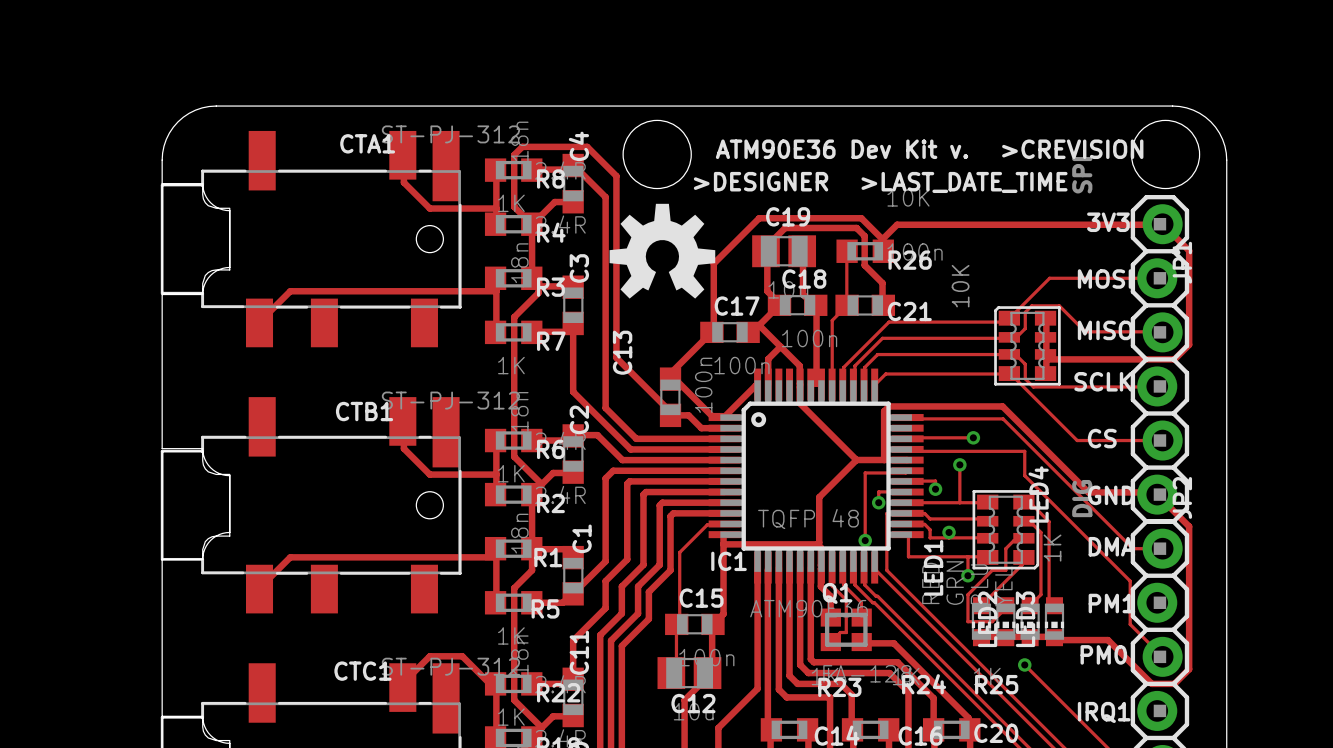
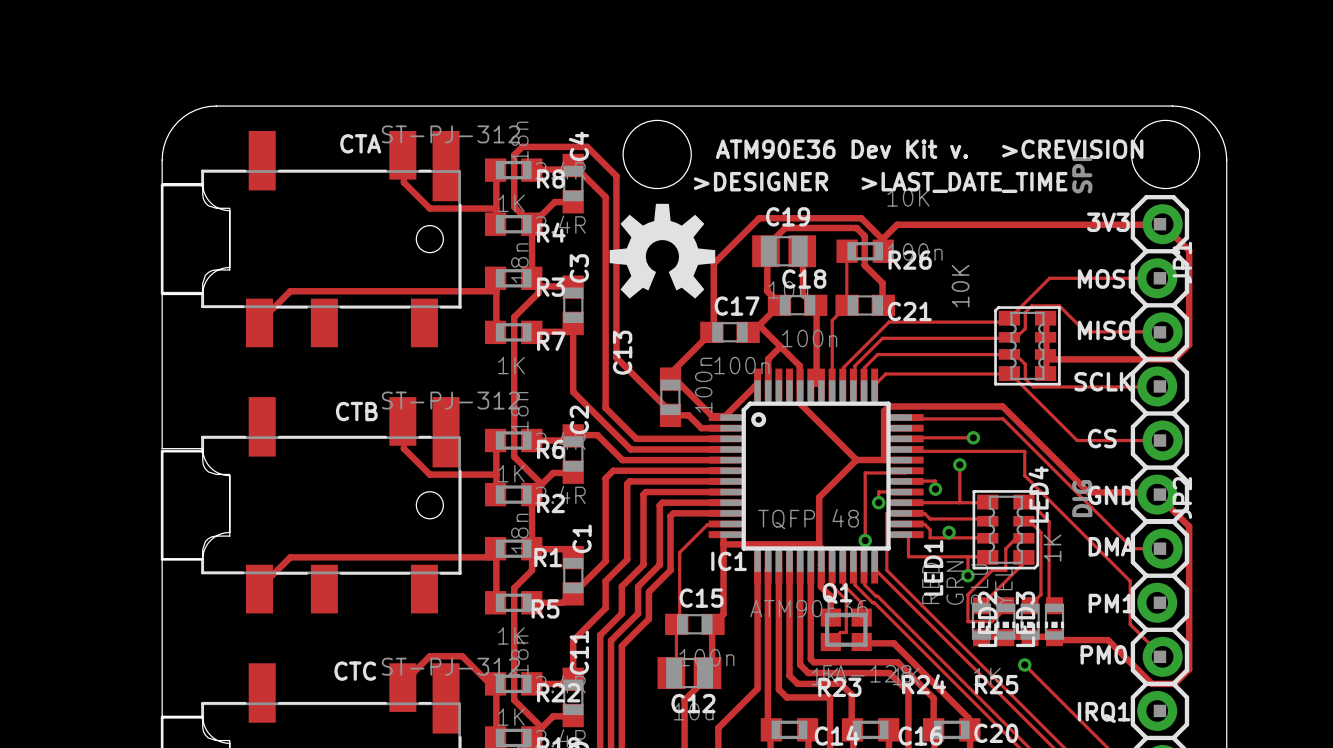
CTA1 name: CTA1 (367, 143) -> CTA (360, 143)
CTB1 name: CTB1 (364, 411) -> CTB (356, 411)
CTC1 name: CTC1 (362, 671) -> CTC (355, 671)

